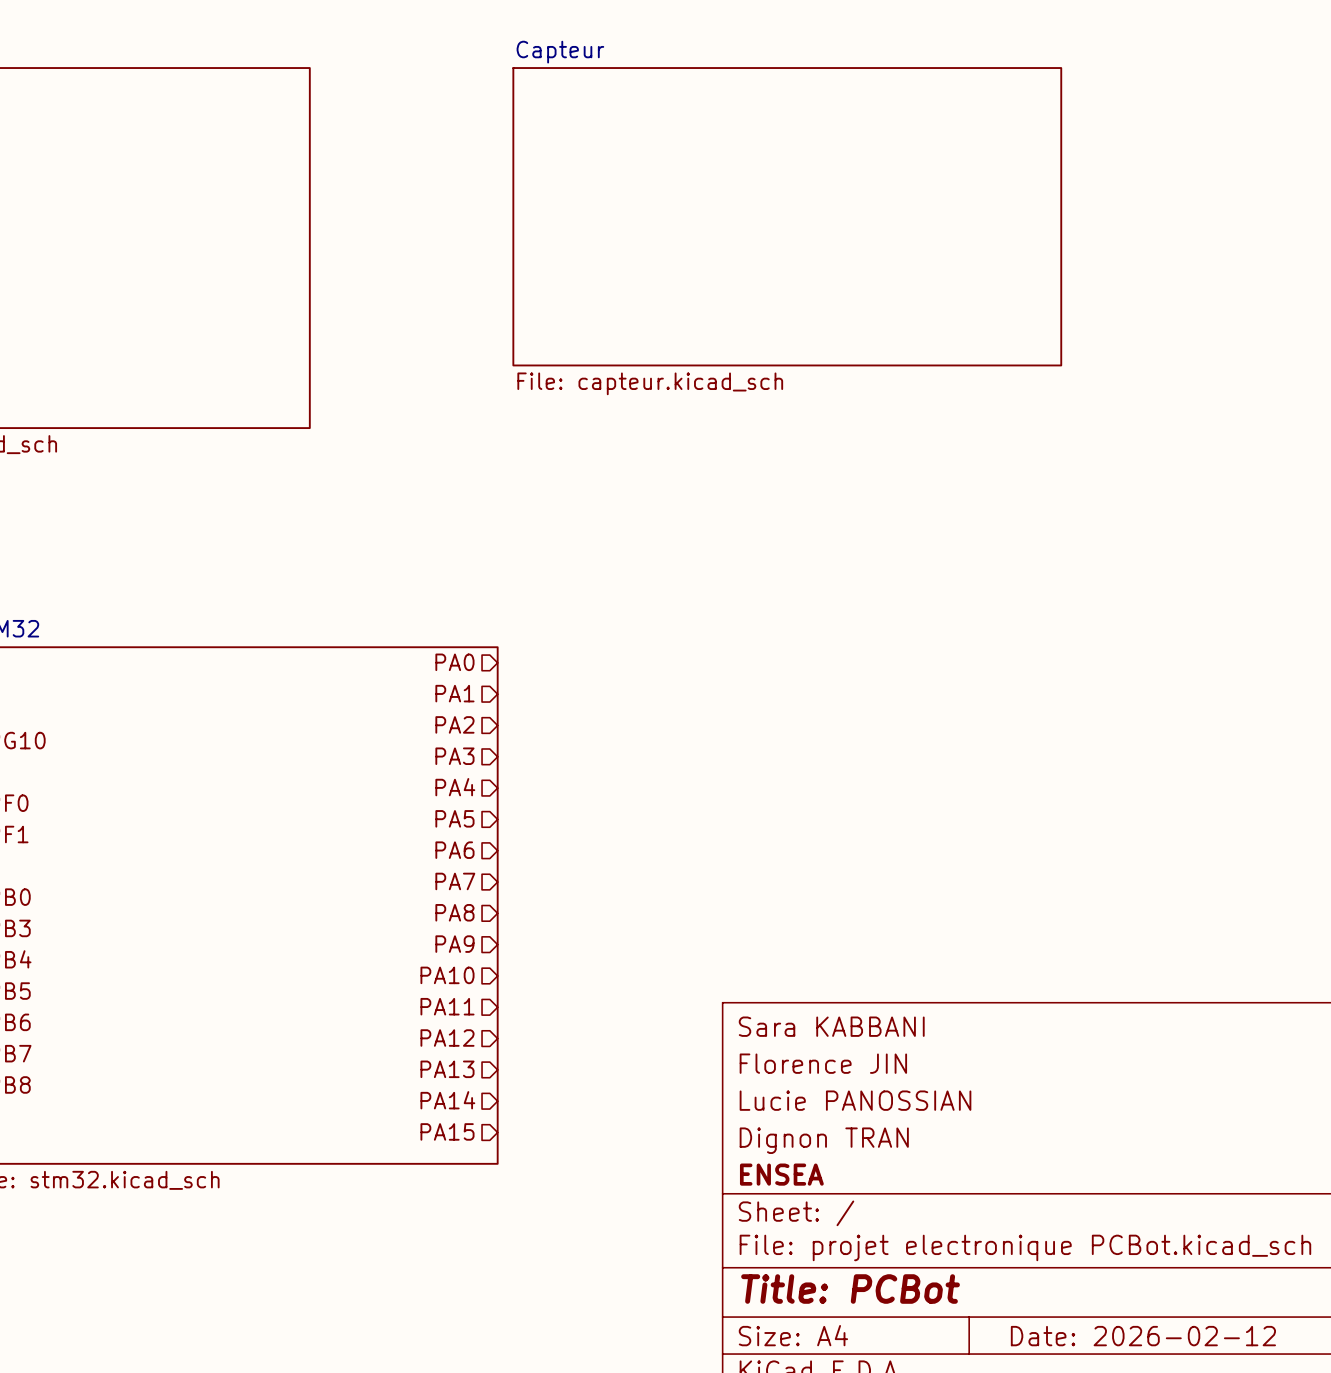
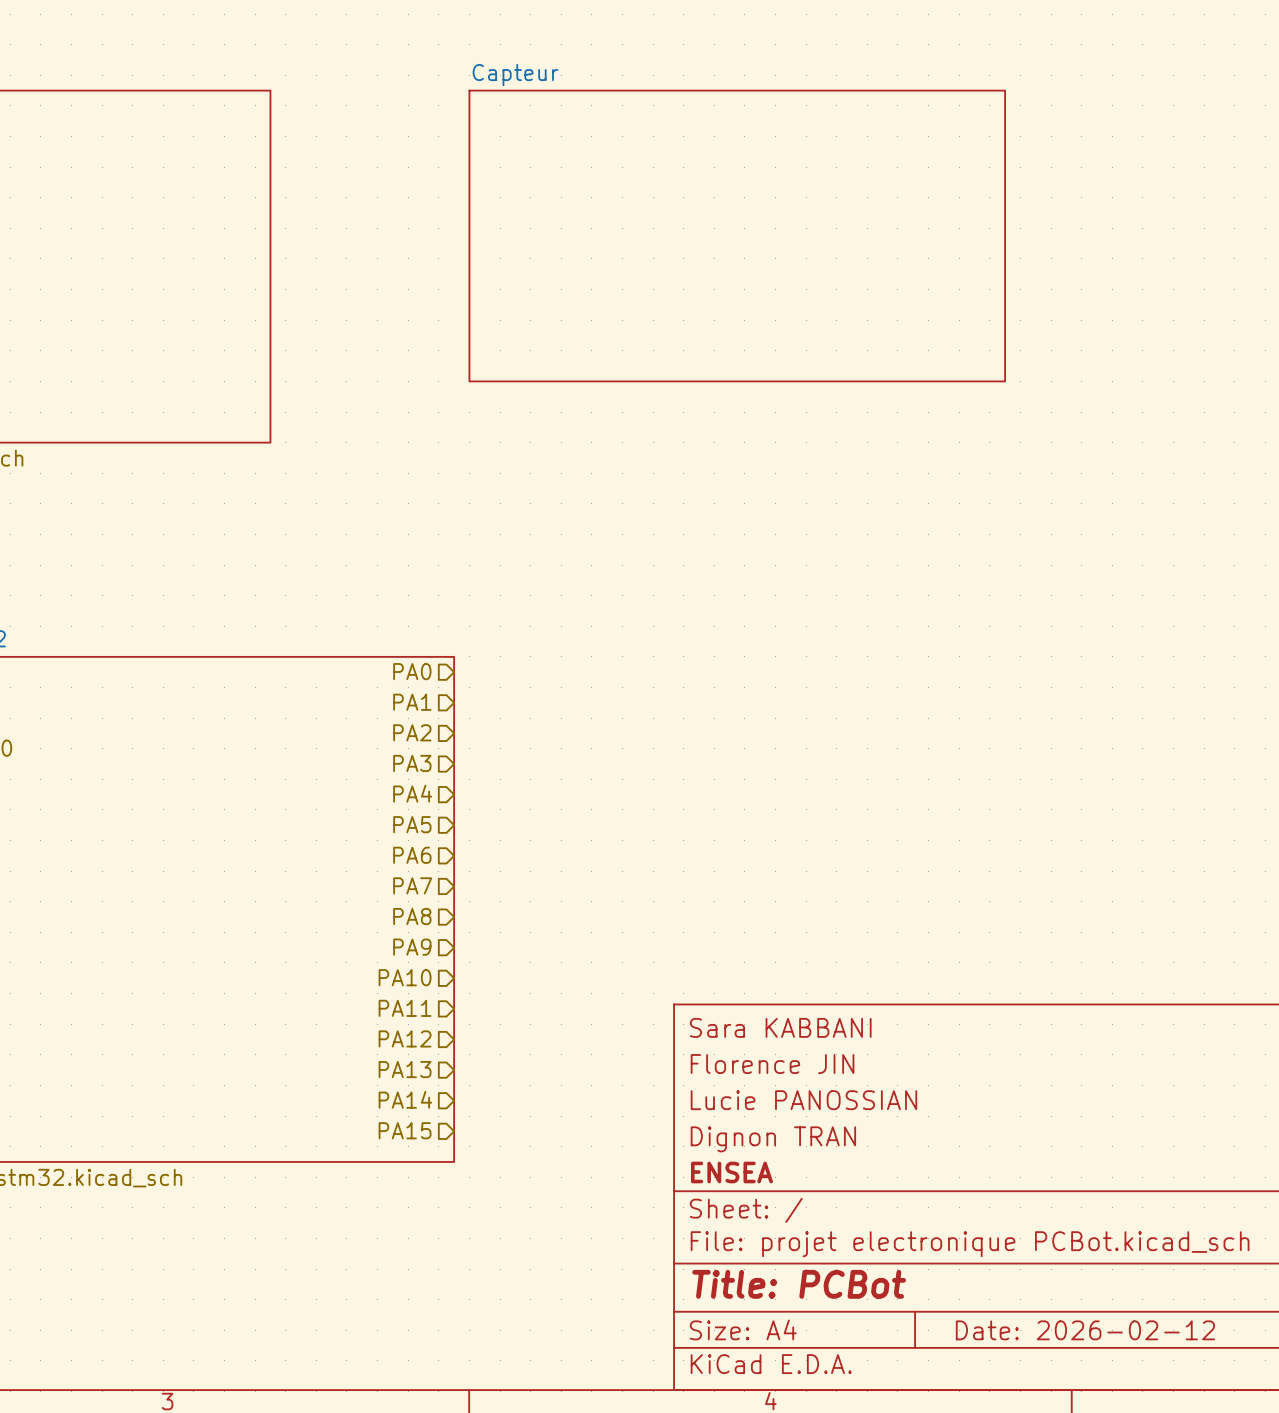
sheet Capteur value: File: capteur.kicad_sch (650, 383) -> none

